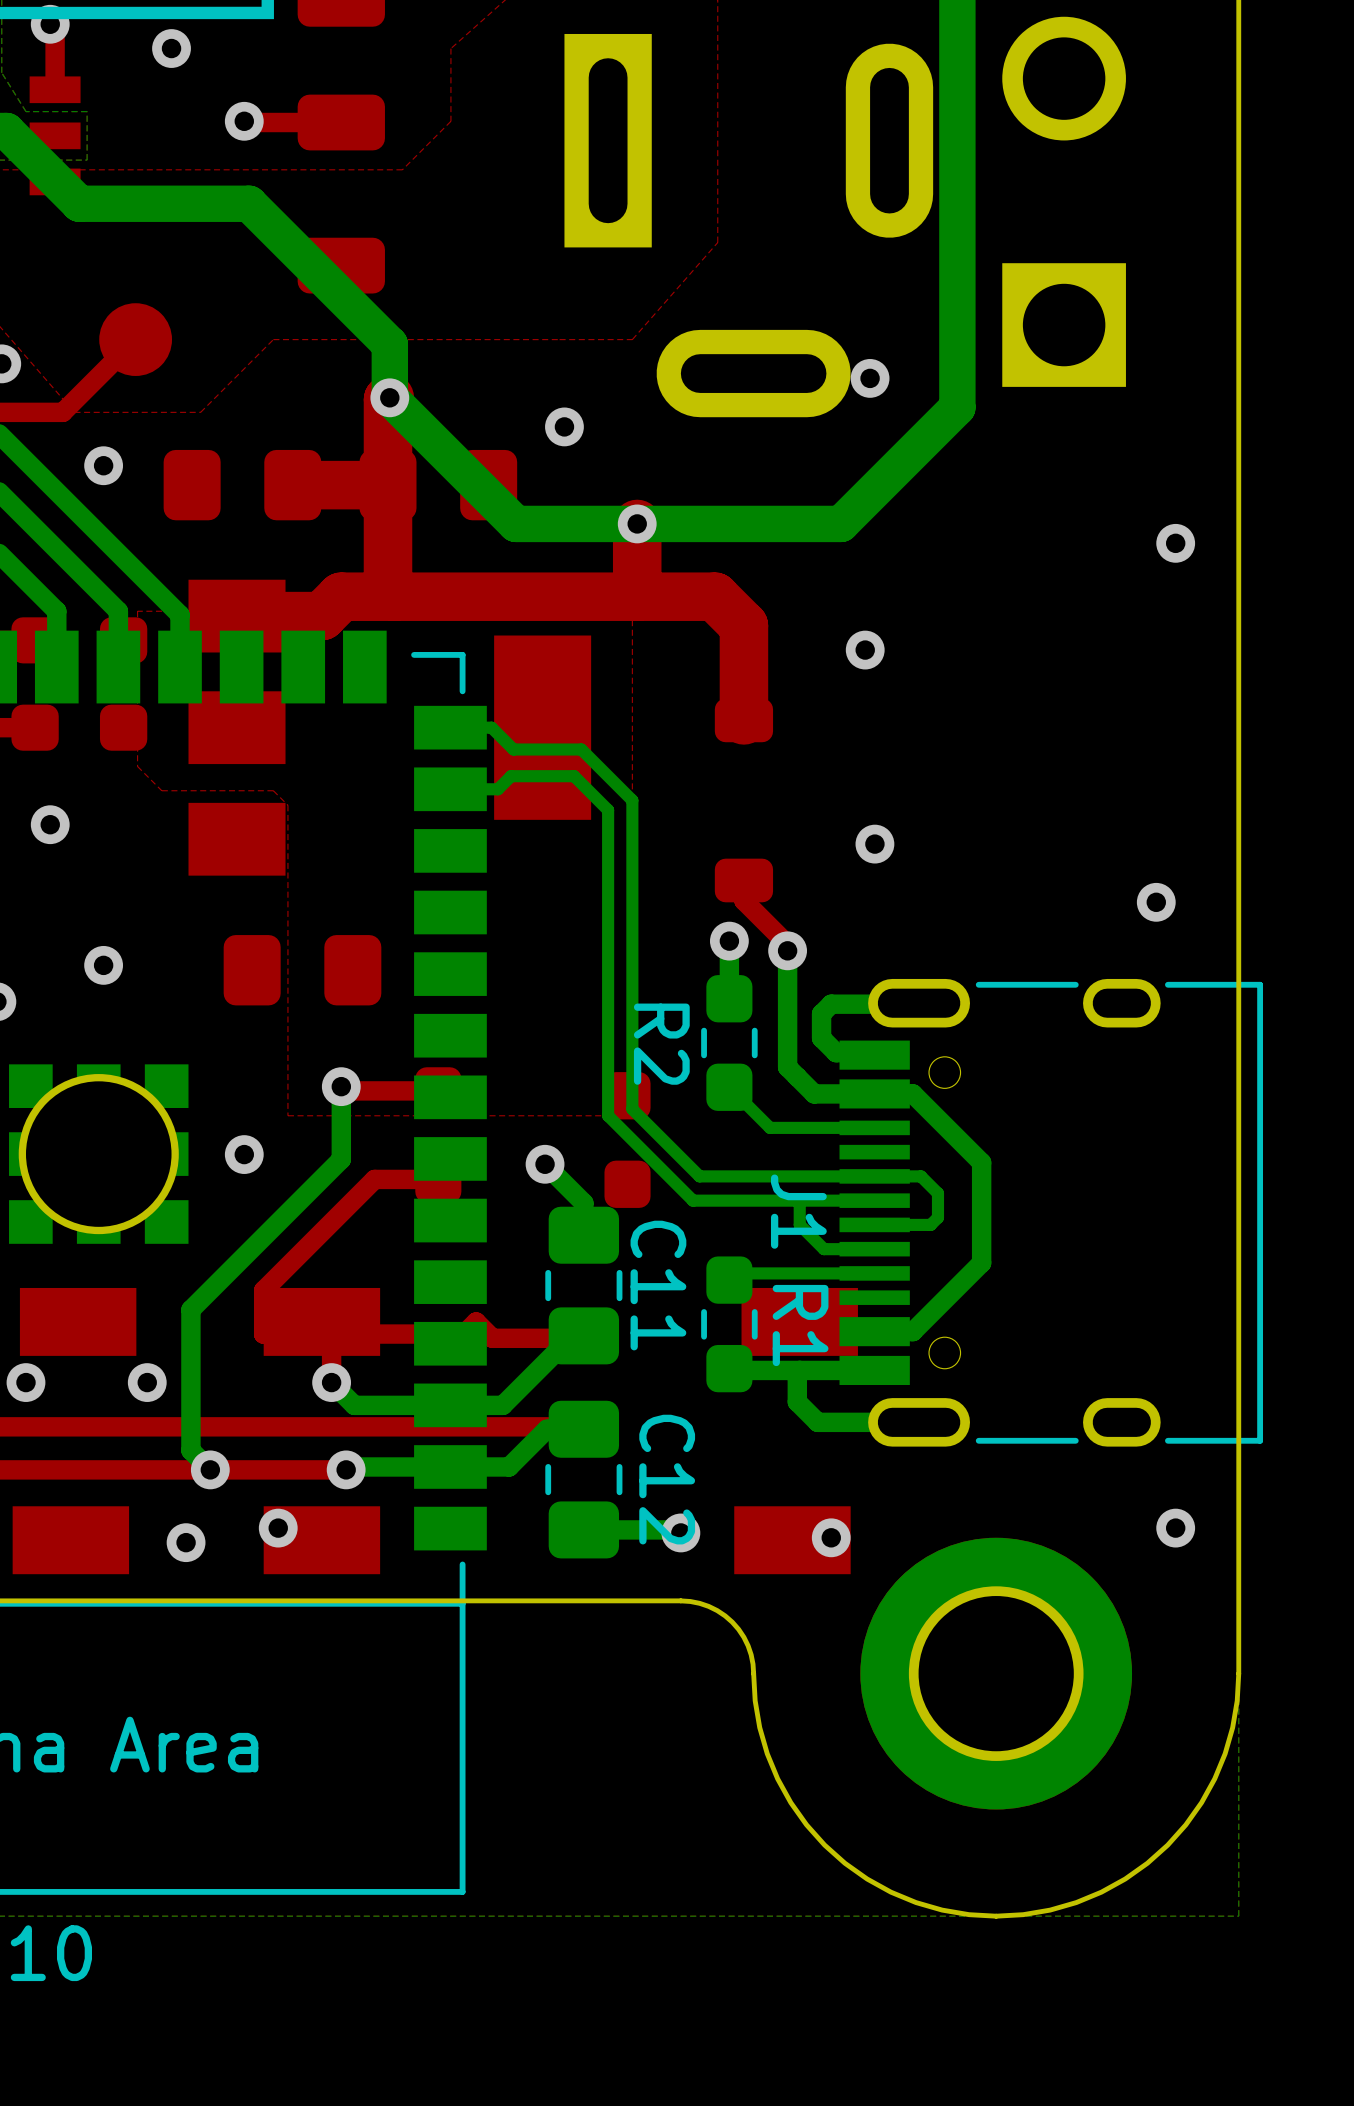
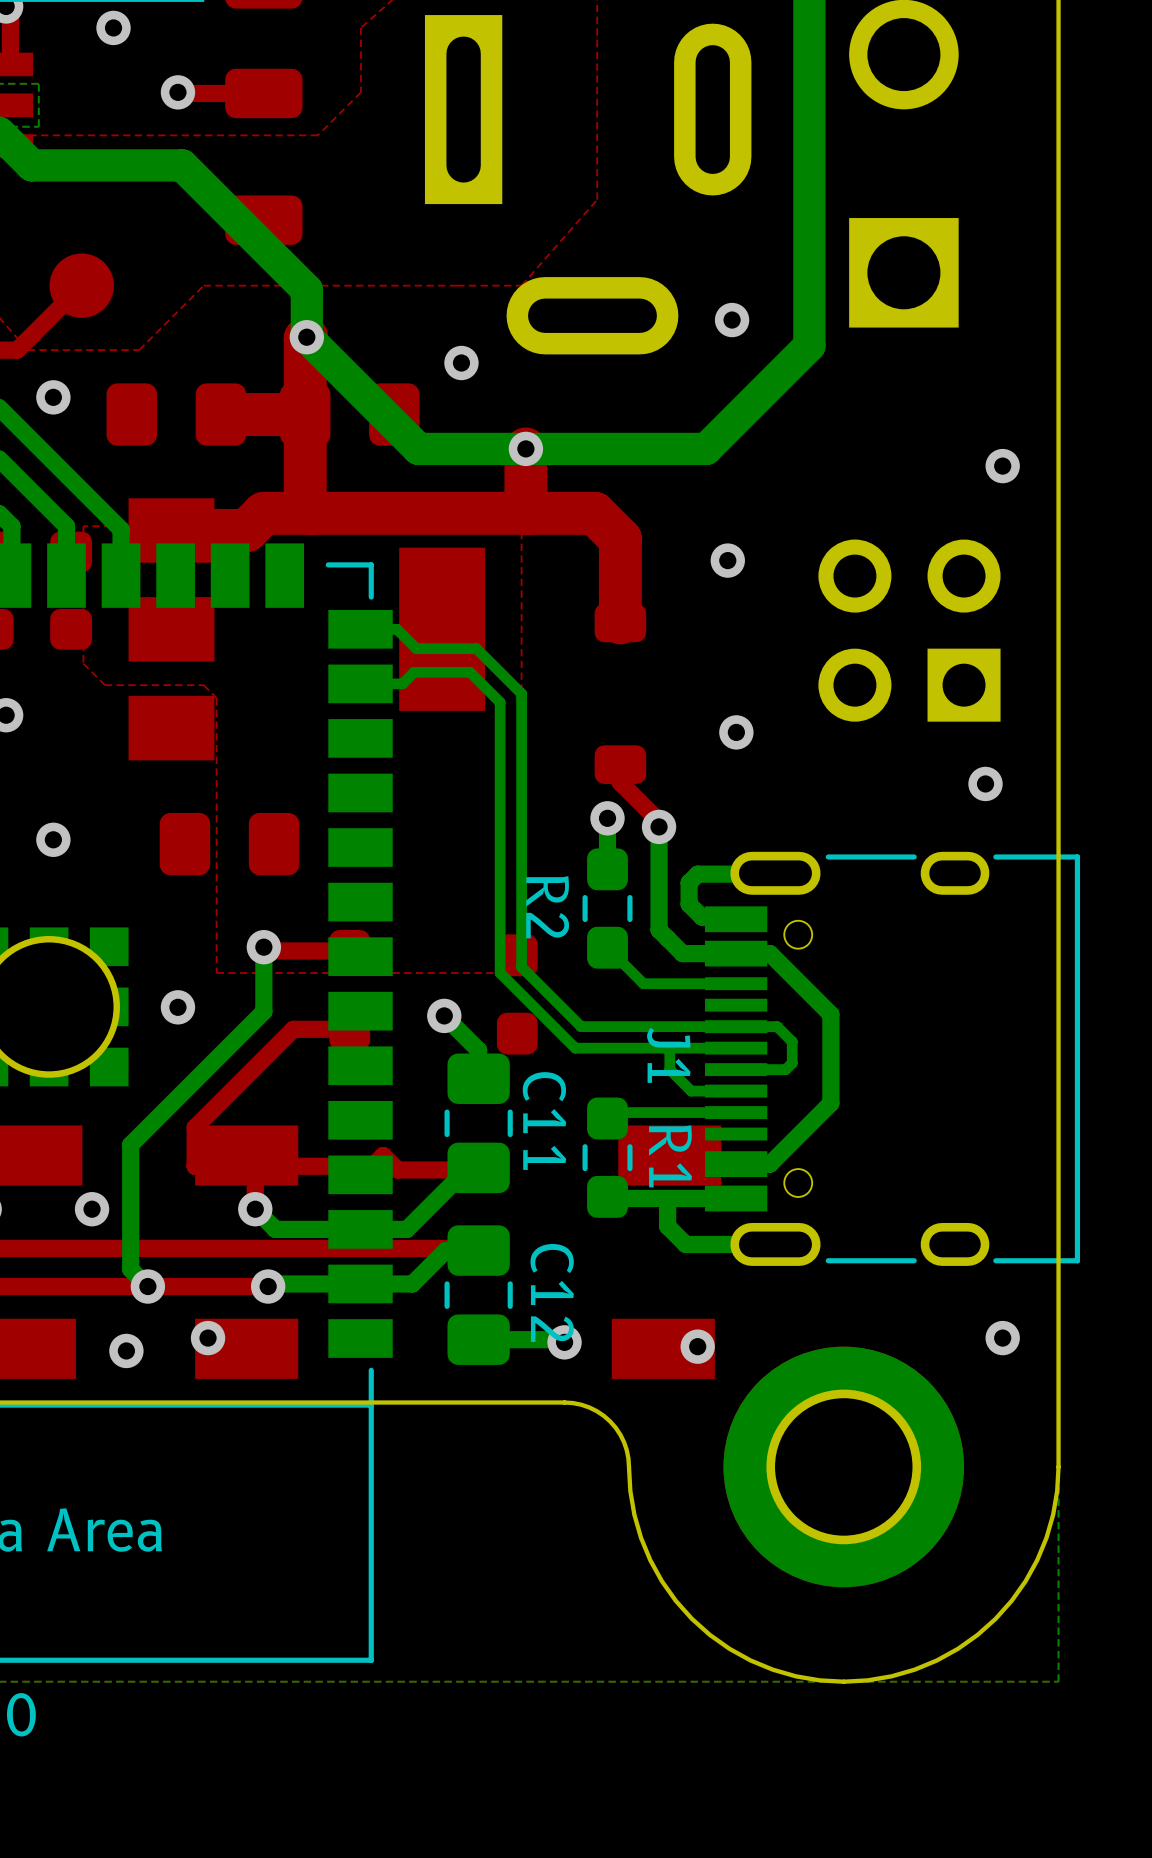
part position: (748, 225) -> (588, 184)
part: none -> (909, 630)

